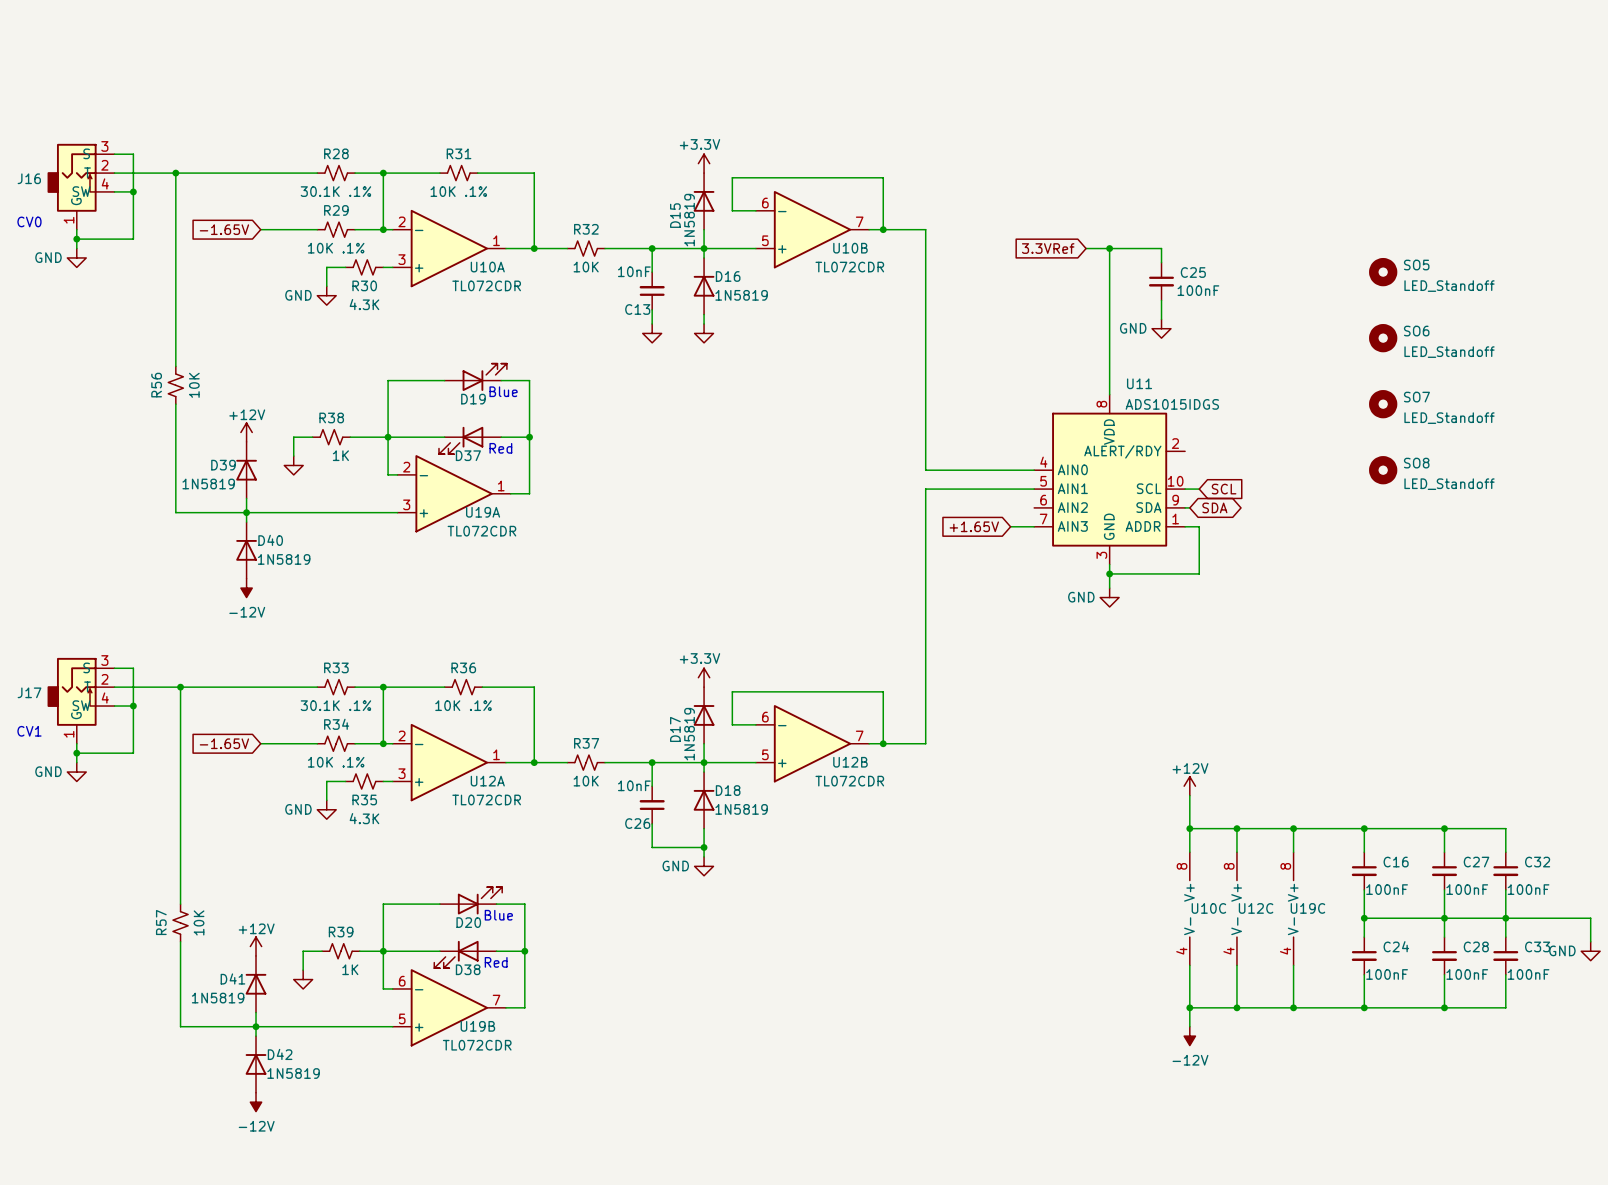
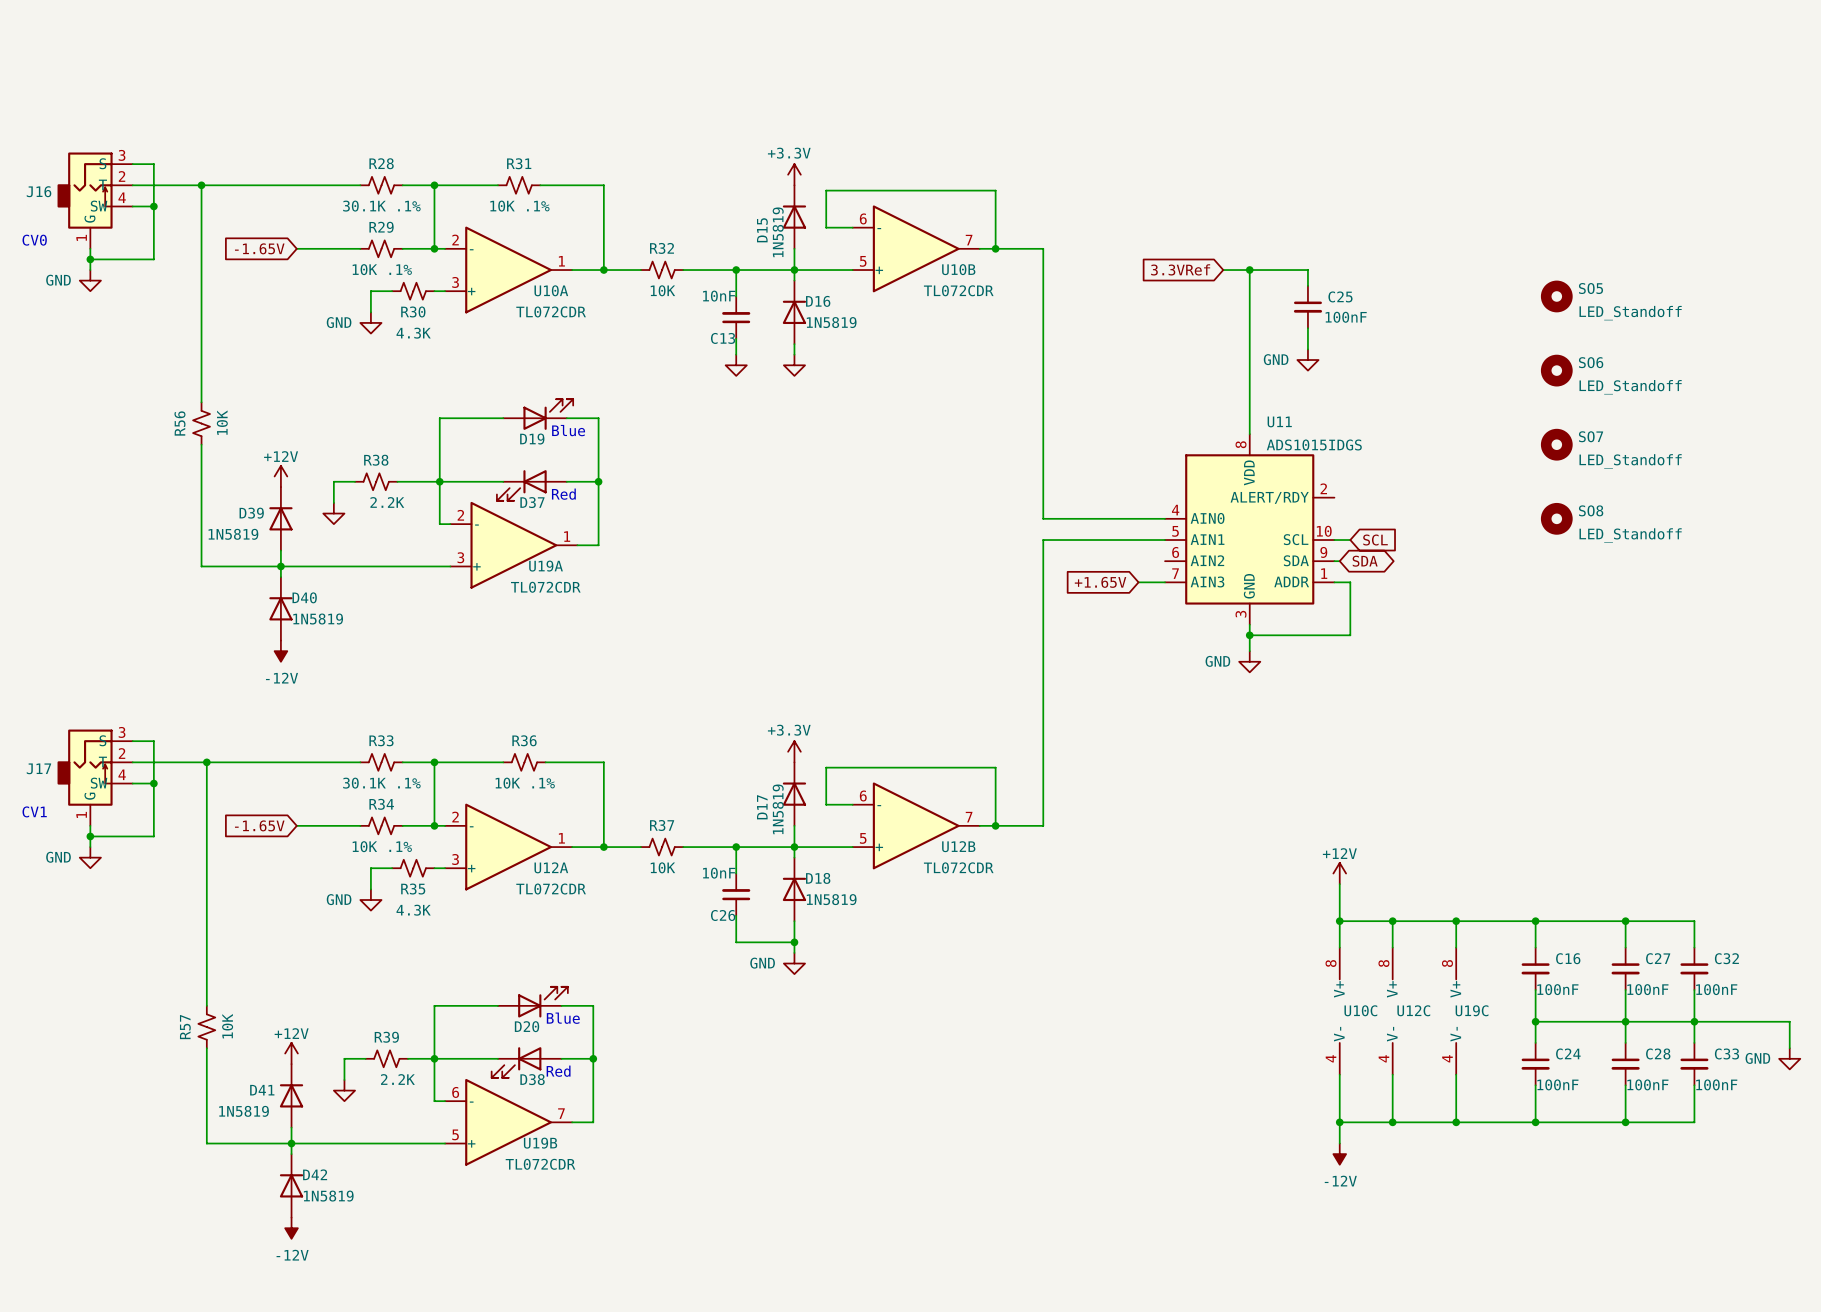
R38 value: 1K (340, 455) -> 2.2K (387, 502)
R39 value: 1K (350, 969) -> 2.2K (397, 1079)

